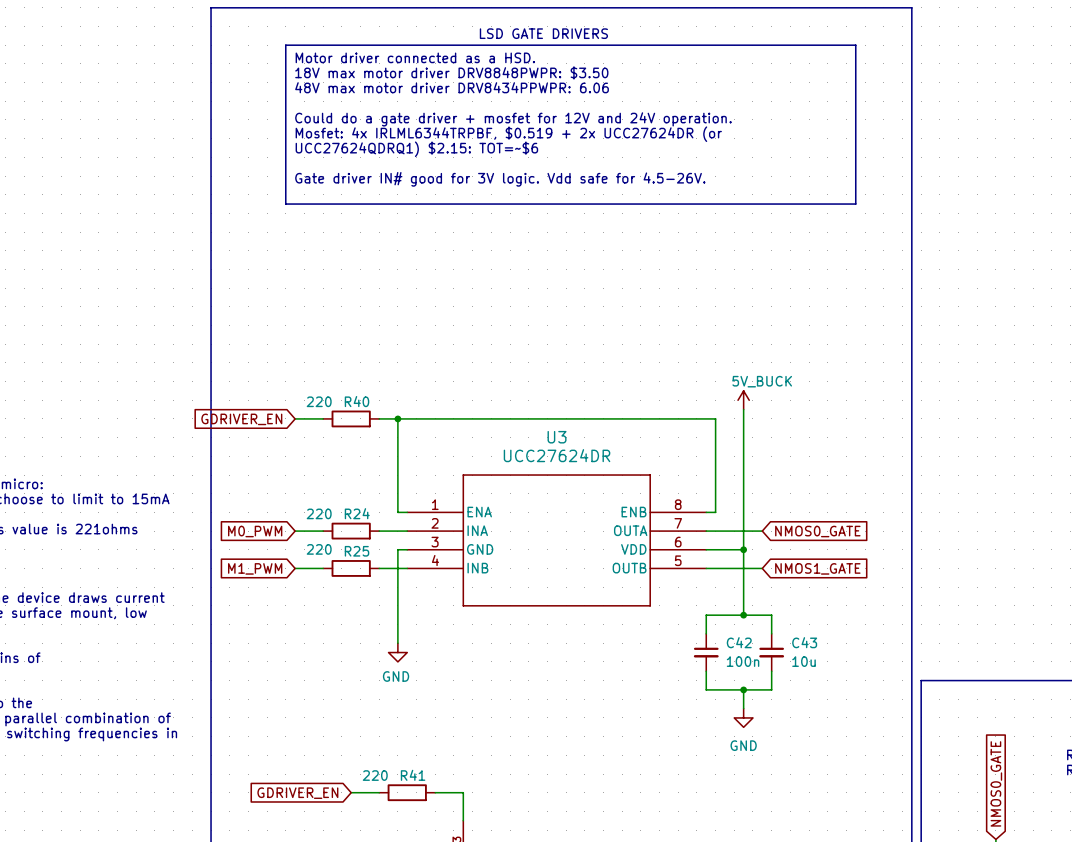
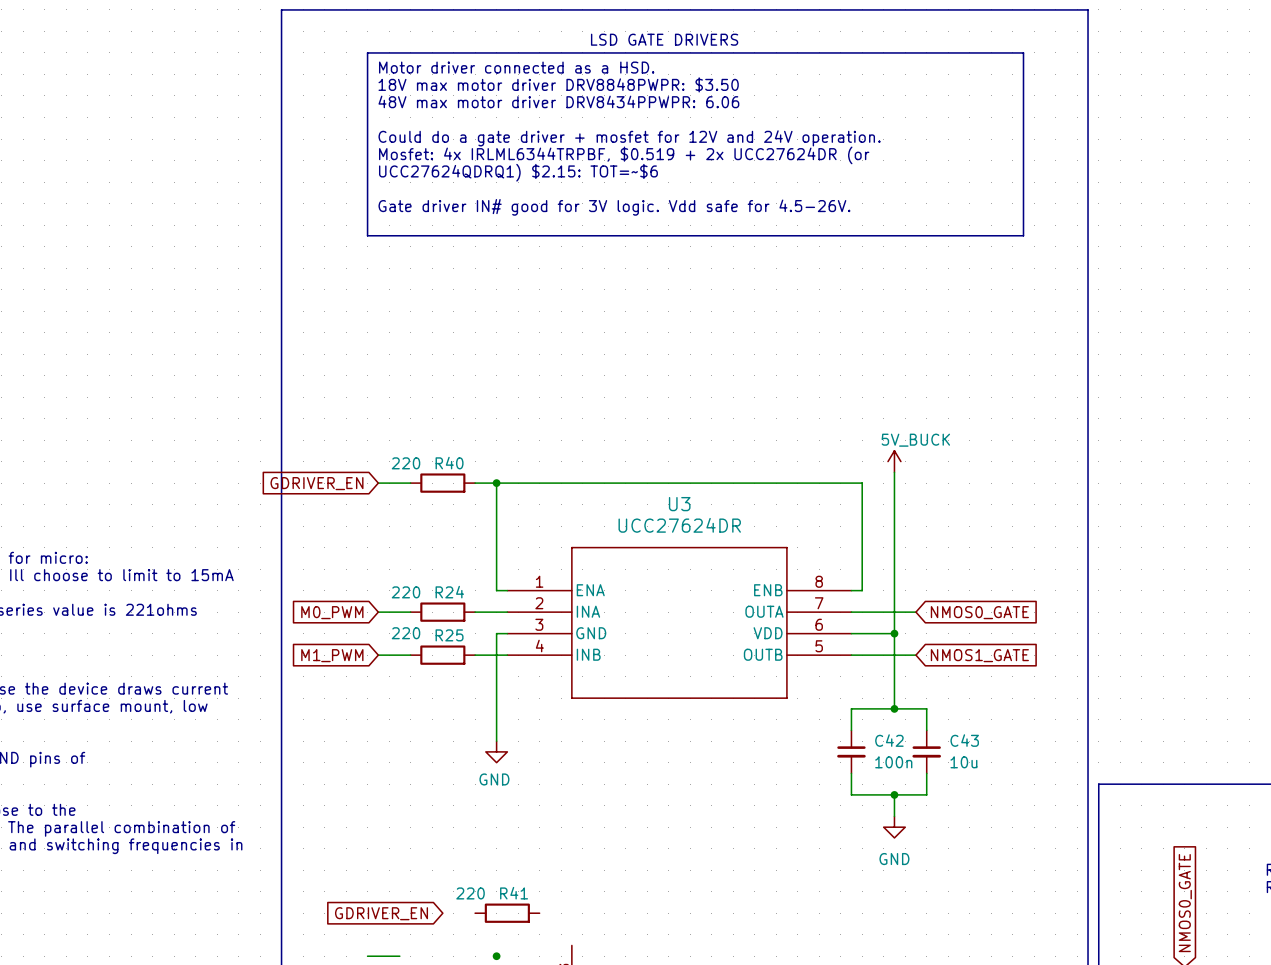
wire: (351, 792) (379, 792) -> (367, 956) (399, 956)
wire: (435, 792) (463, 792) (463, 820) -> none
junction: none -> (496, 956)

